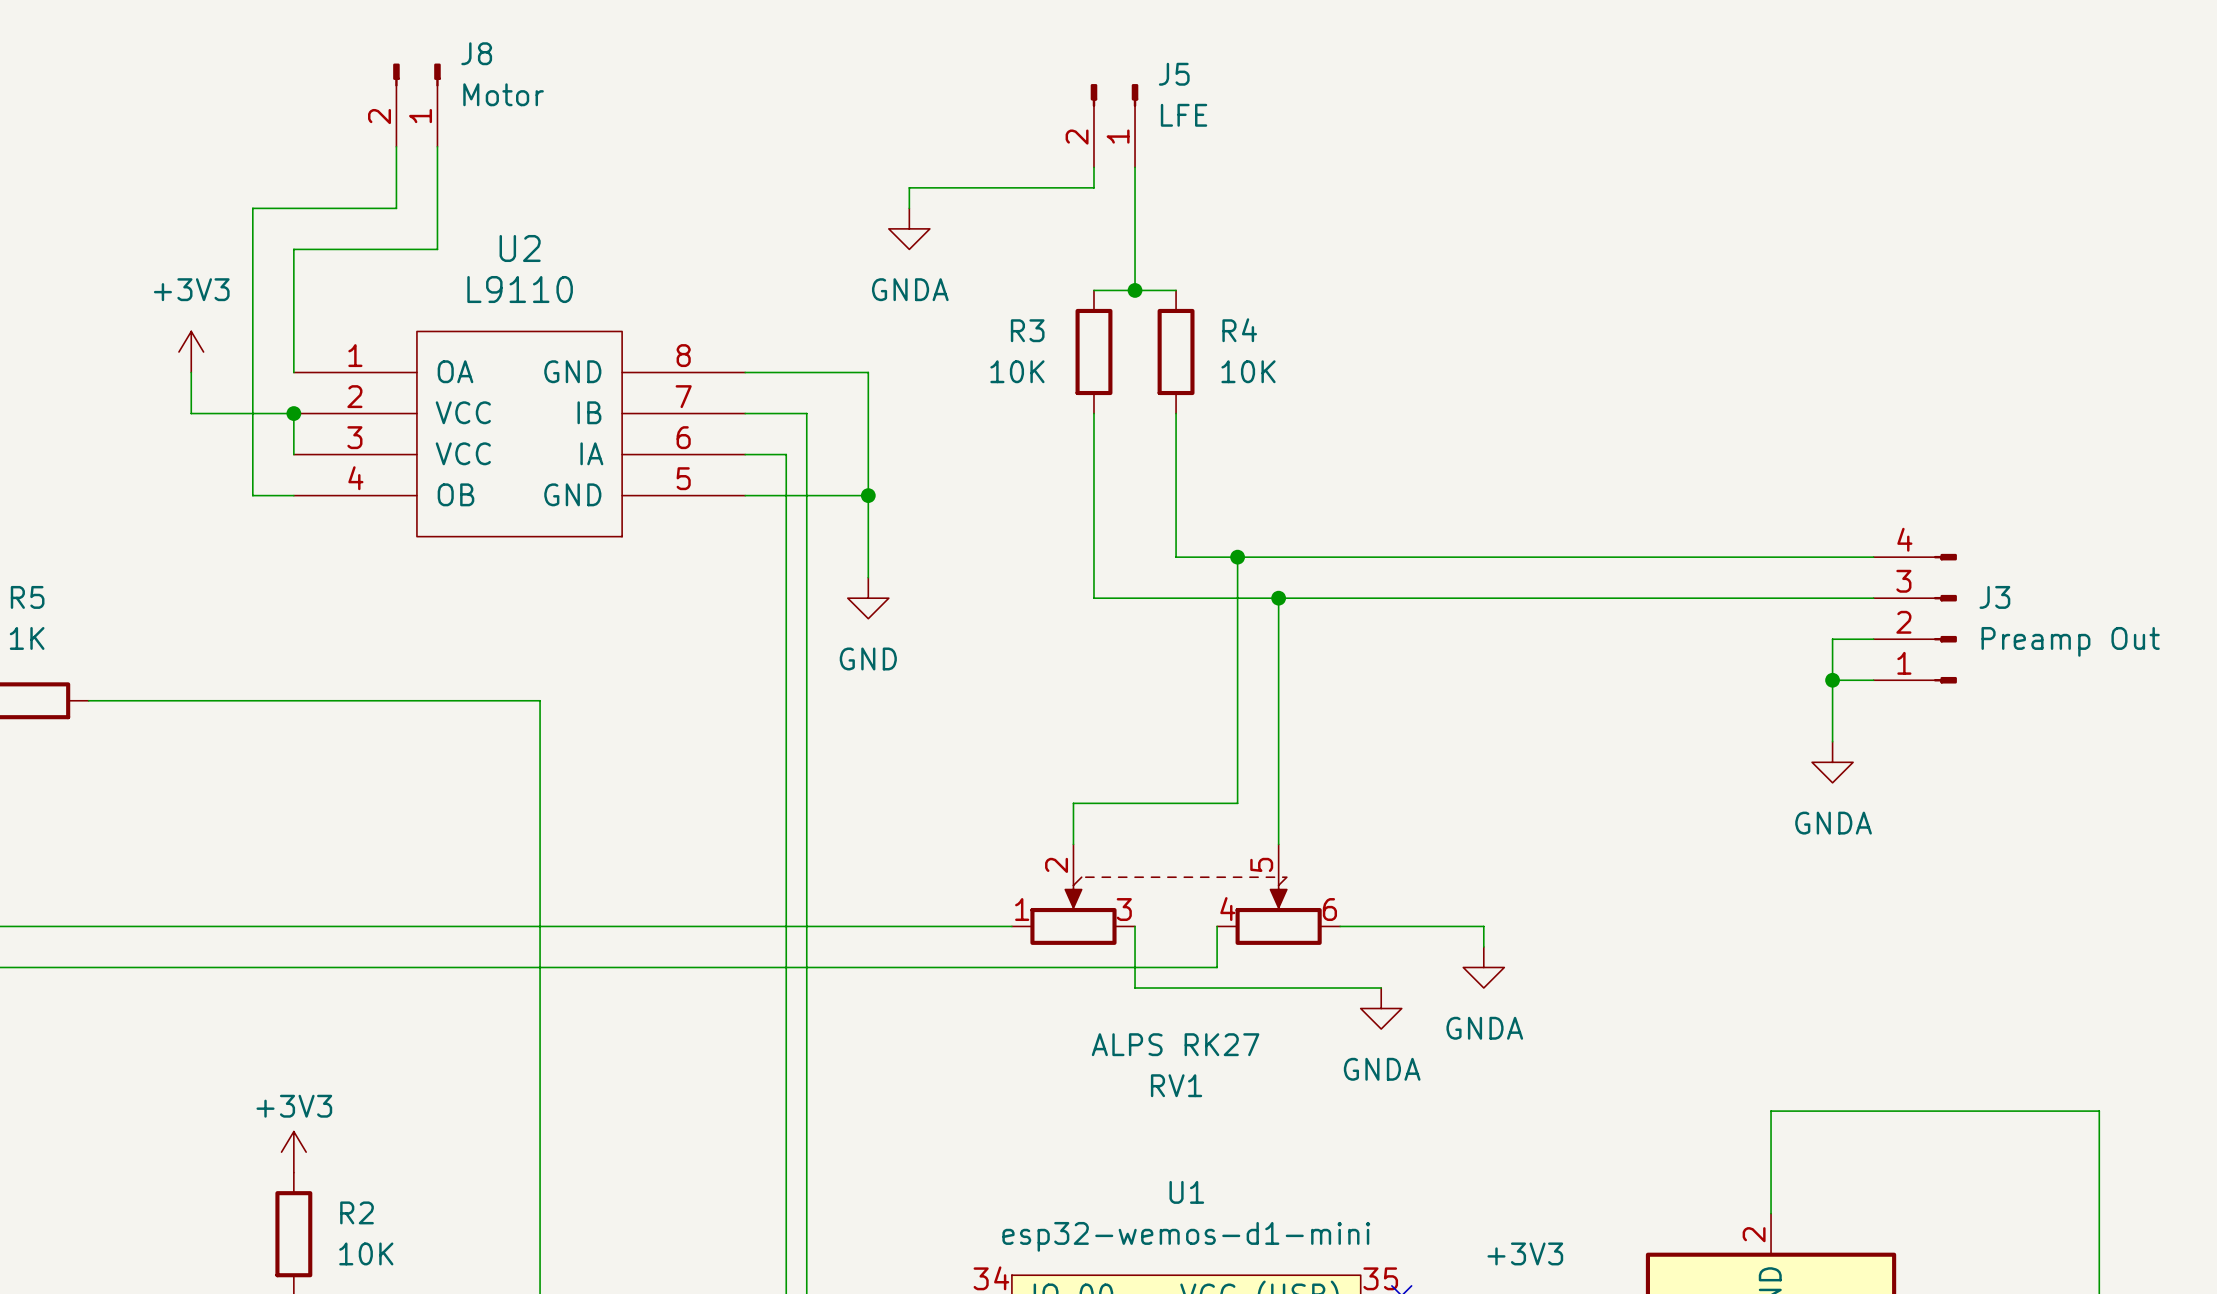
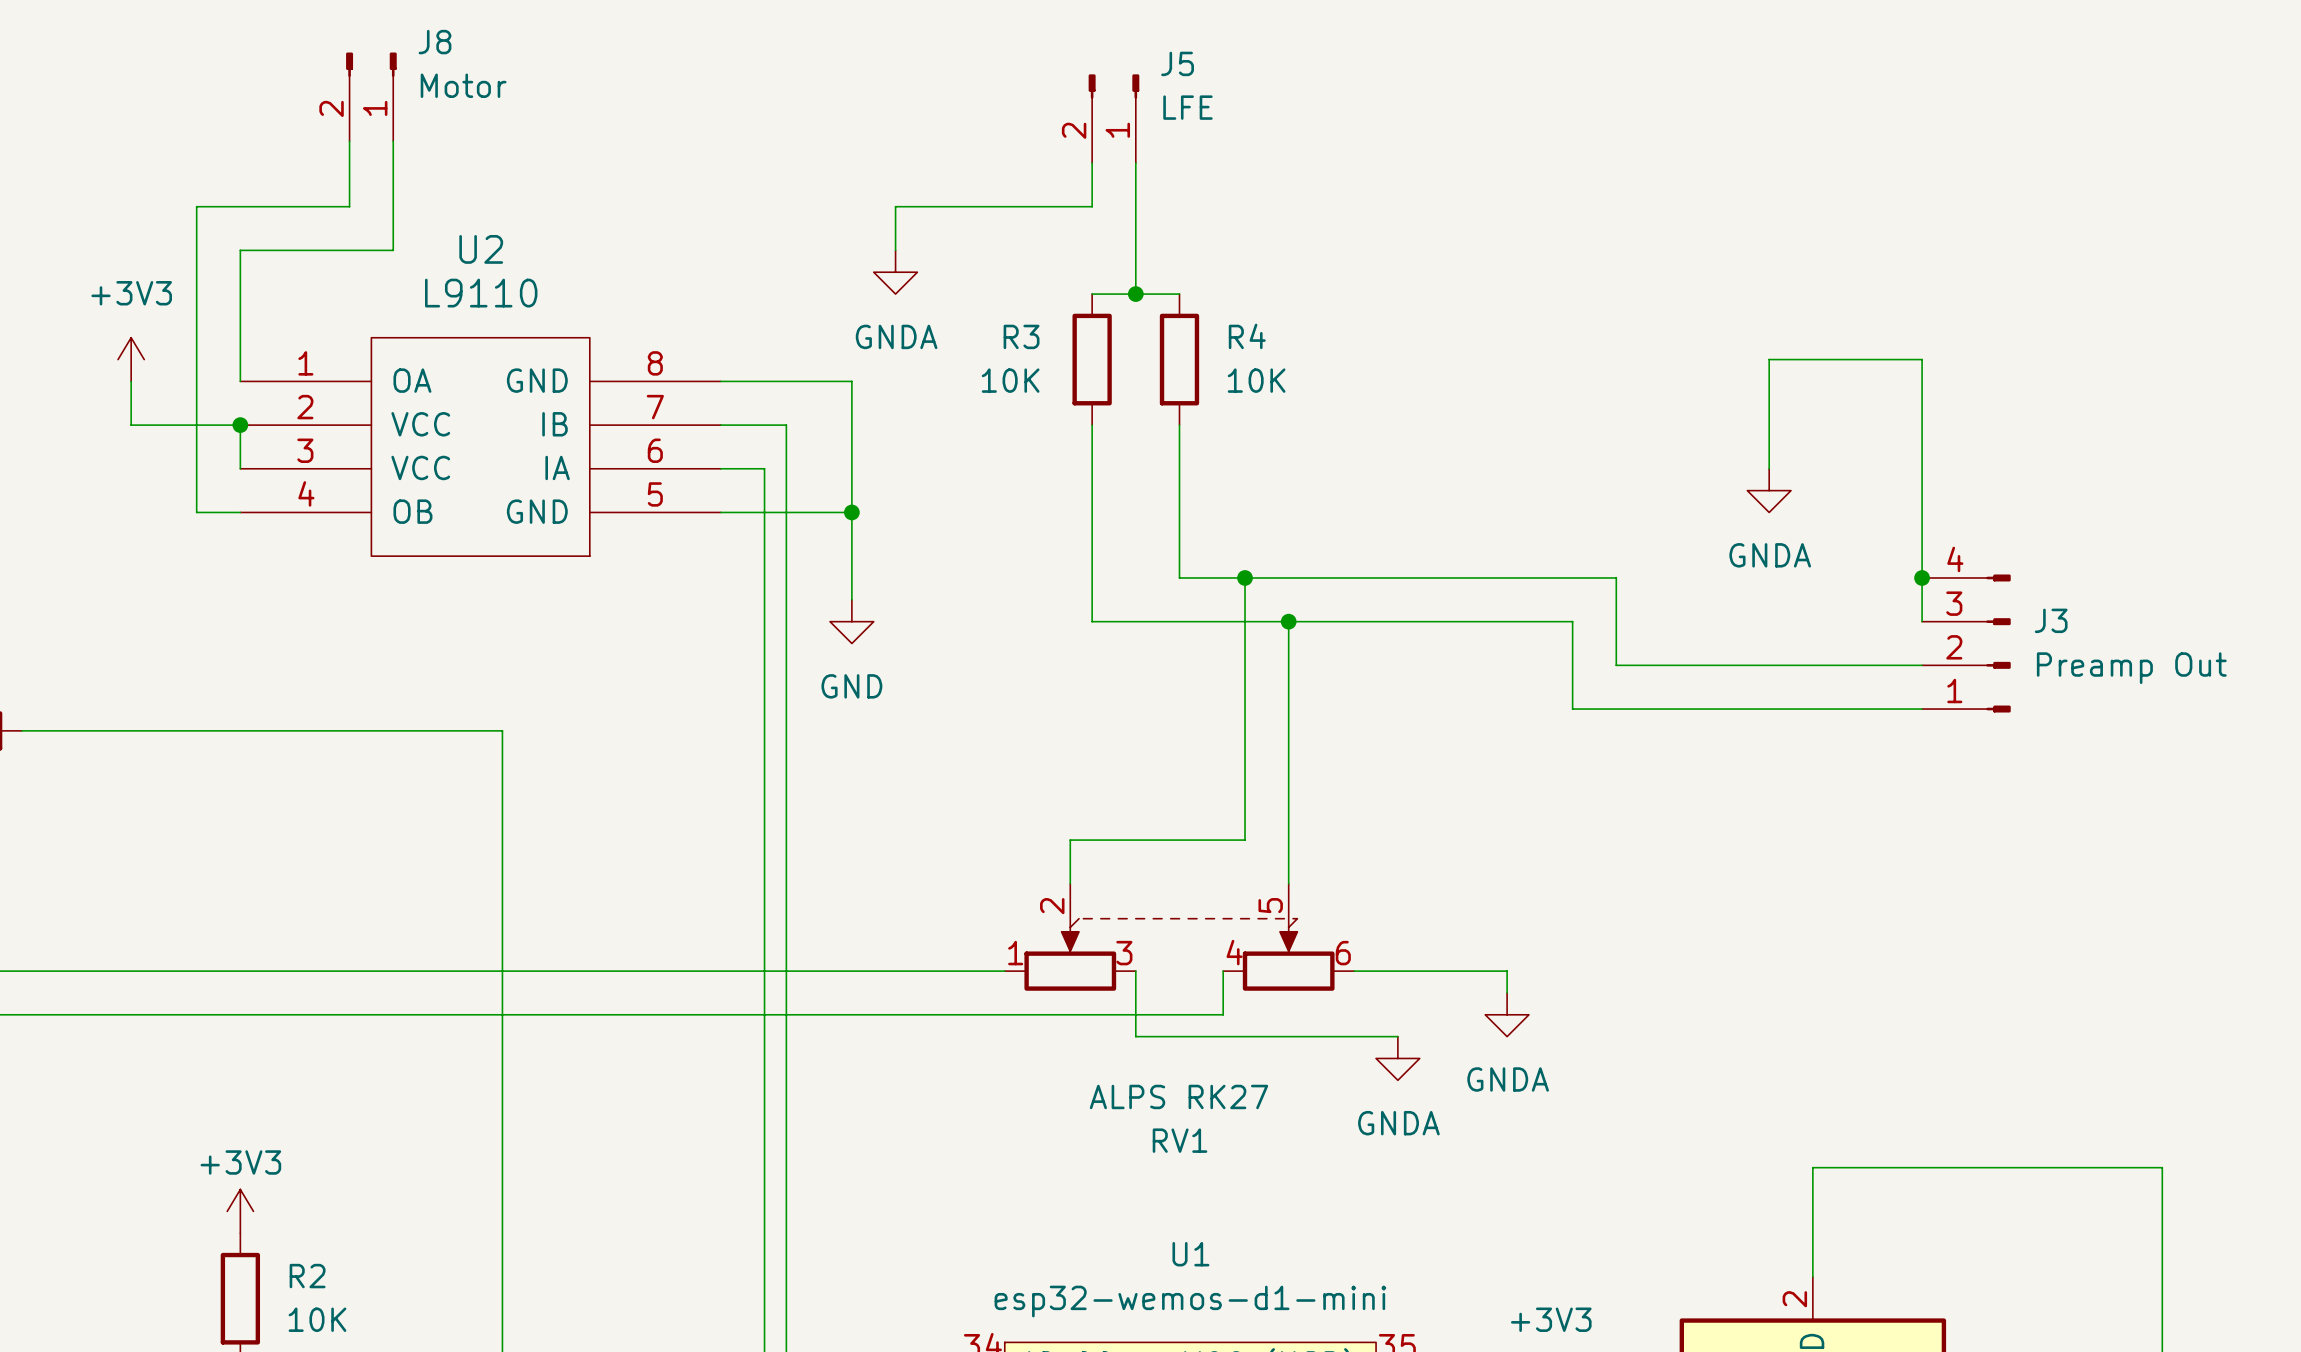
wire: (1093, 187) (909, 187) (909, 208) -> (1092, 184) (1092, 206) (895, 206) (895, 250)
power symbol position: GNDA (909, 228) -> GNDA (895, 272)
wire: none -> (1769, 468) (1769, 359) (1922, 359) (1922, 621)
wire: (1586, 557) (1873, 557) -> (1616, 577) (1616, 665) (1878, 665)
junction: none -> (1922, 577)
wire: (1545, 598) (1873, 598) -> (1572, 621) (1572, 709) (1878, 709)
wire: (1832, 639) (1832, 741) -> none
junction: (1832, 680) -> none
power symbol position: GNDA (1832, 762) -> GNDA (1769, 490)

